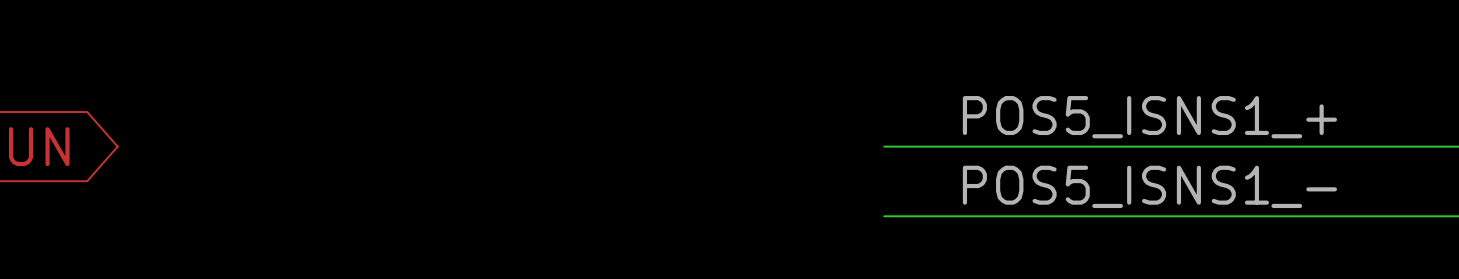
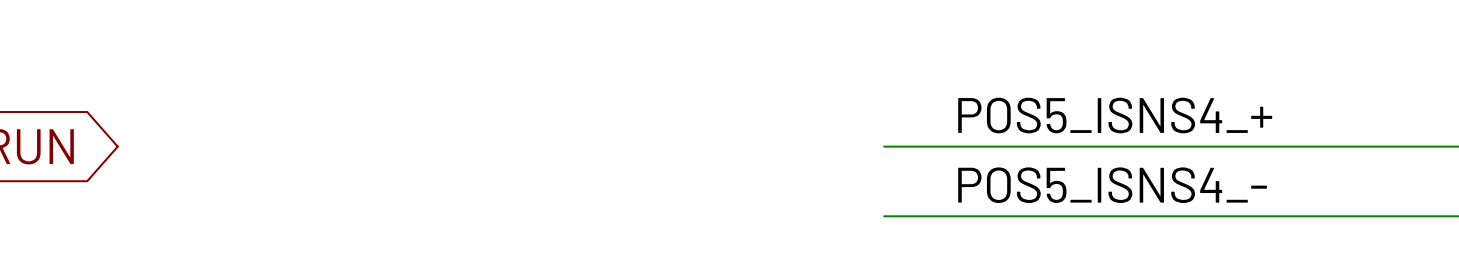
label: POS5_ISNS1_+ (1149, 117) -> POS5_ISNS4_+ (1115, 115)
label: POS5_ISNS1_- (1149, 186) -> POS5_ISNS4_- (1112, 185)

